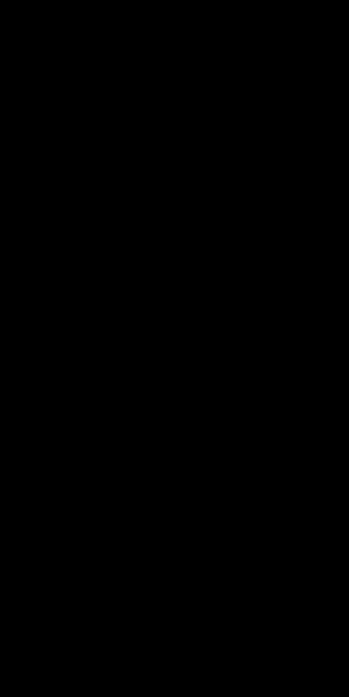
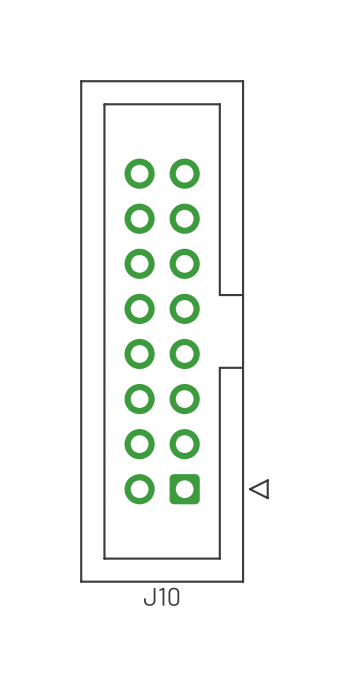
J10: none -> (174, 331)

